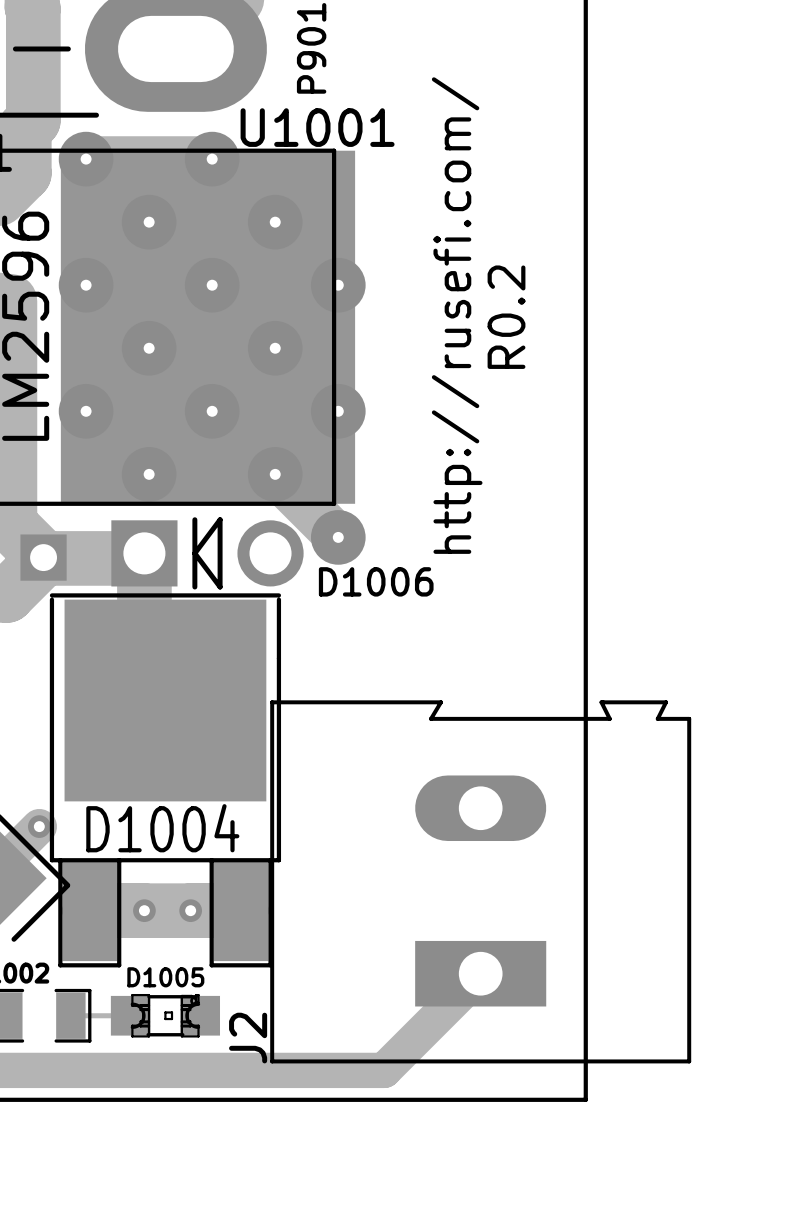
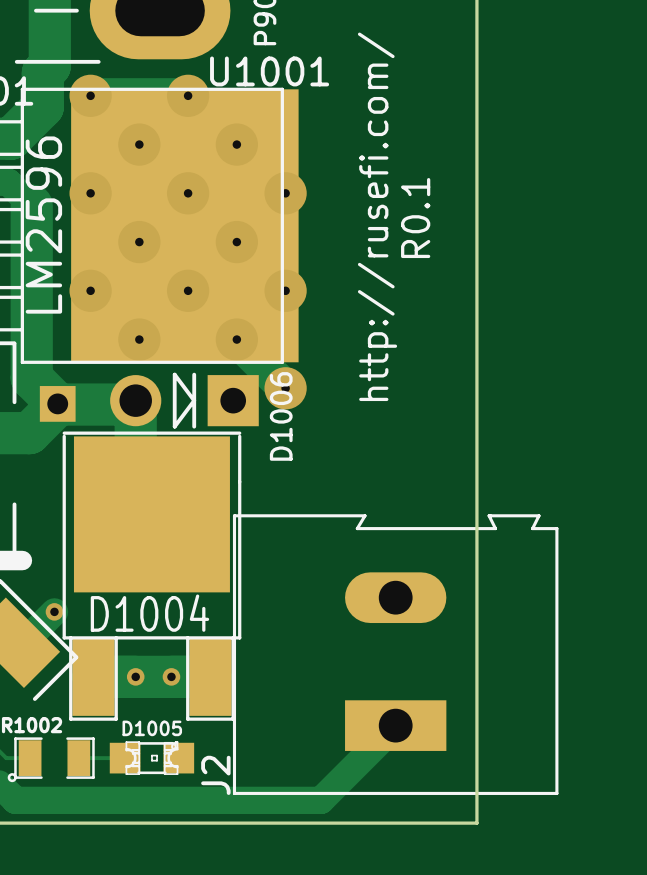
text: R0.2 (506, 317) -> R0.1 (415, 218)
D1006 footprint: [111, 517, 304, 590] -> [110, 372, 259, 429]
D1006 name rotation: 0° (376, 581) -> 90° counterclockwise (281, 416)

